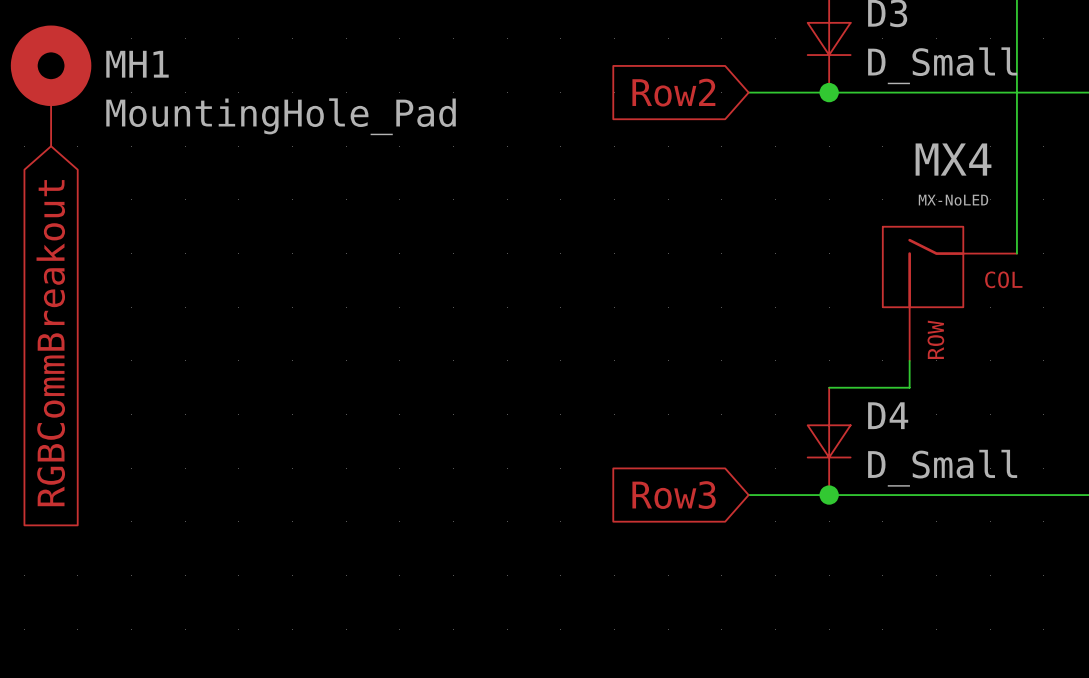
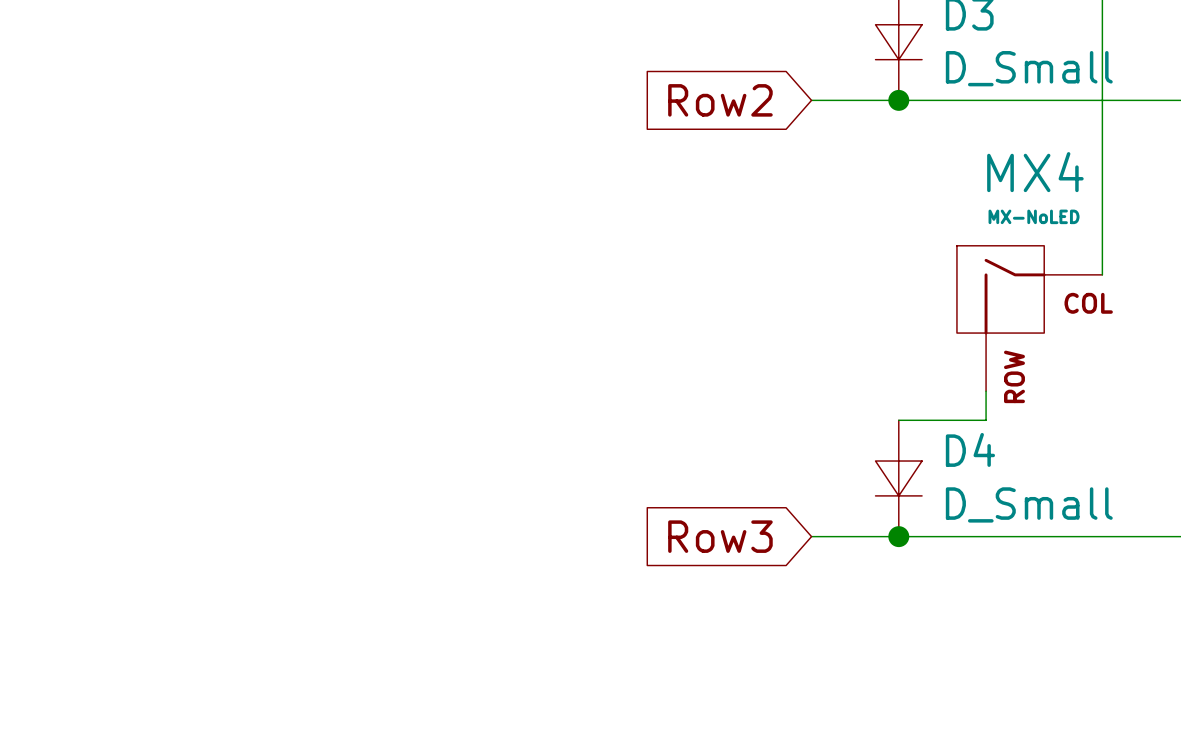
MH1: MountingHole_Pad (51, 85) -> none
global label: RGBCommBreakout (50, 343) -> none

